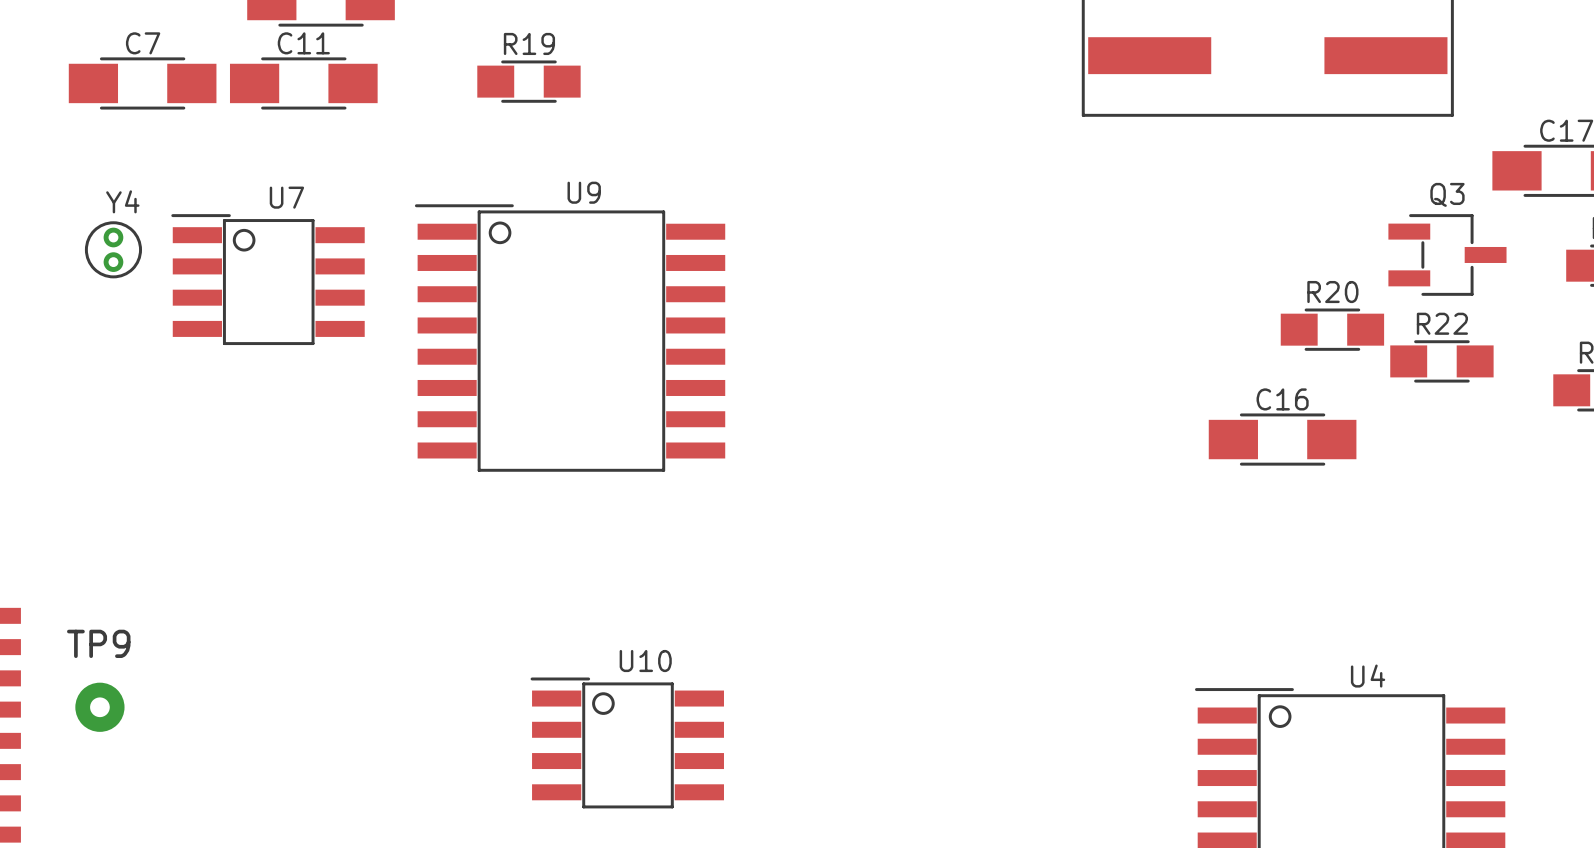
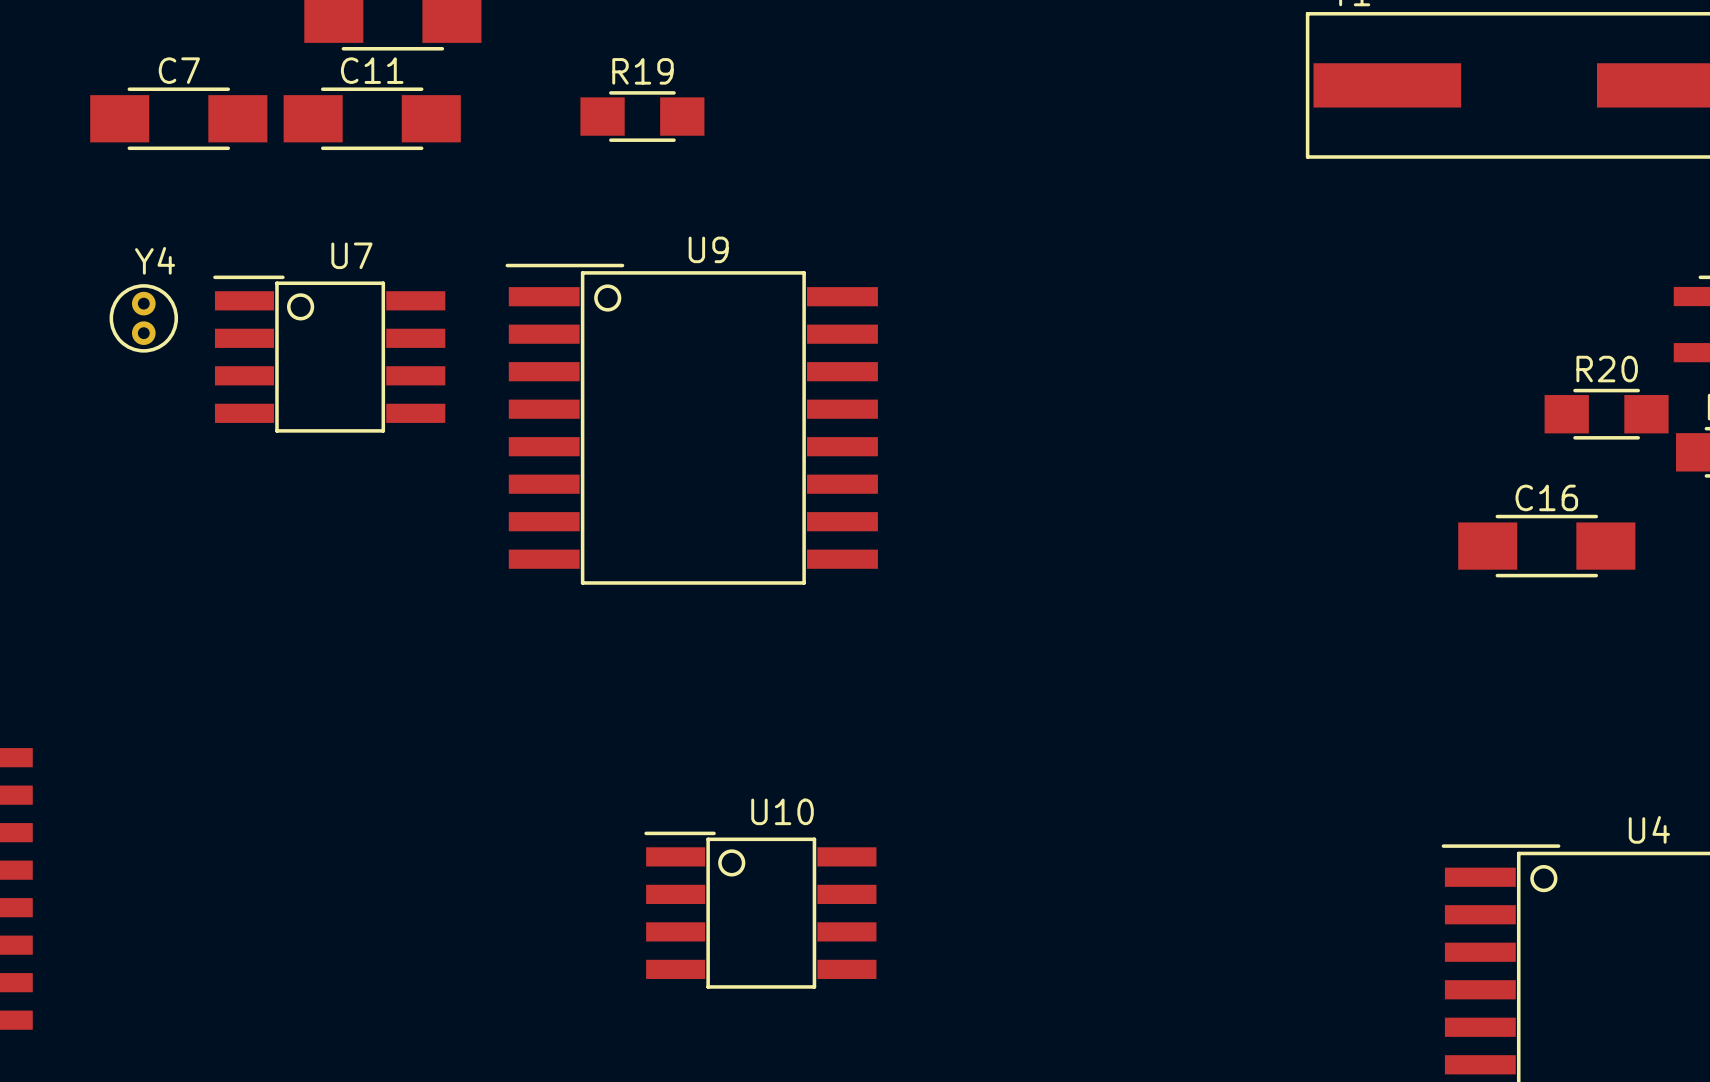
TP9: (99, 707) -> none

